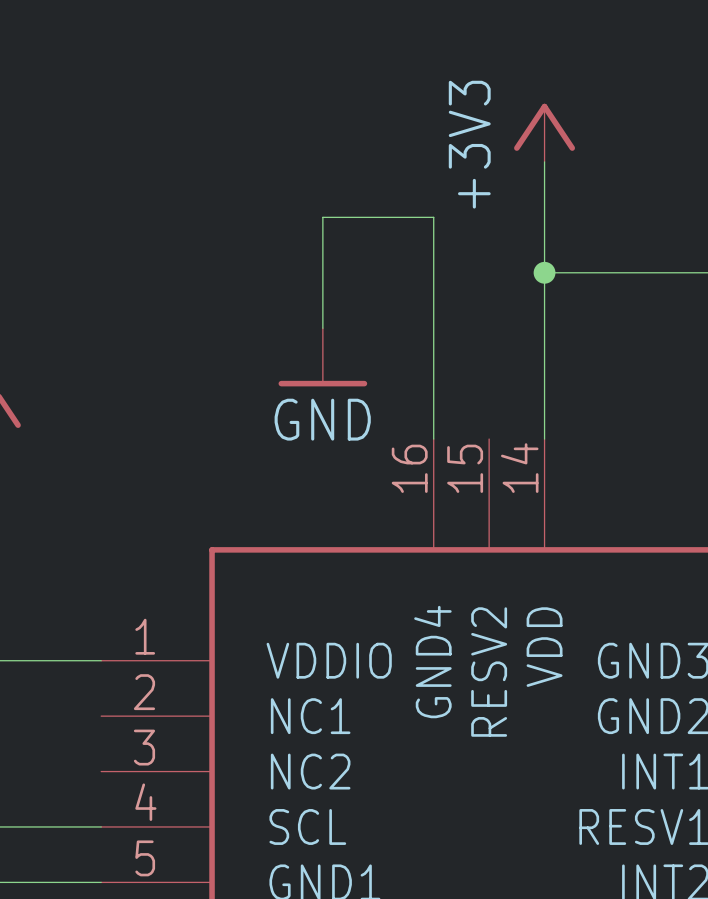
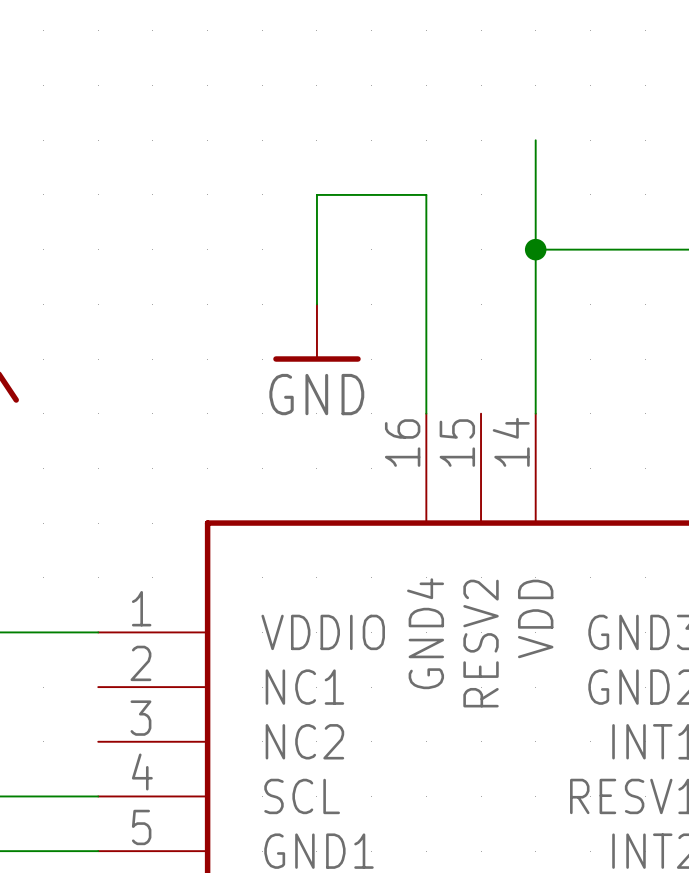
power symbol: +3V3 (544, 132) -> none

